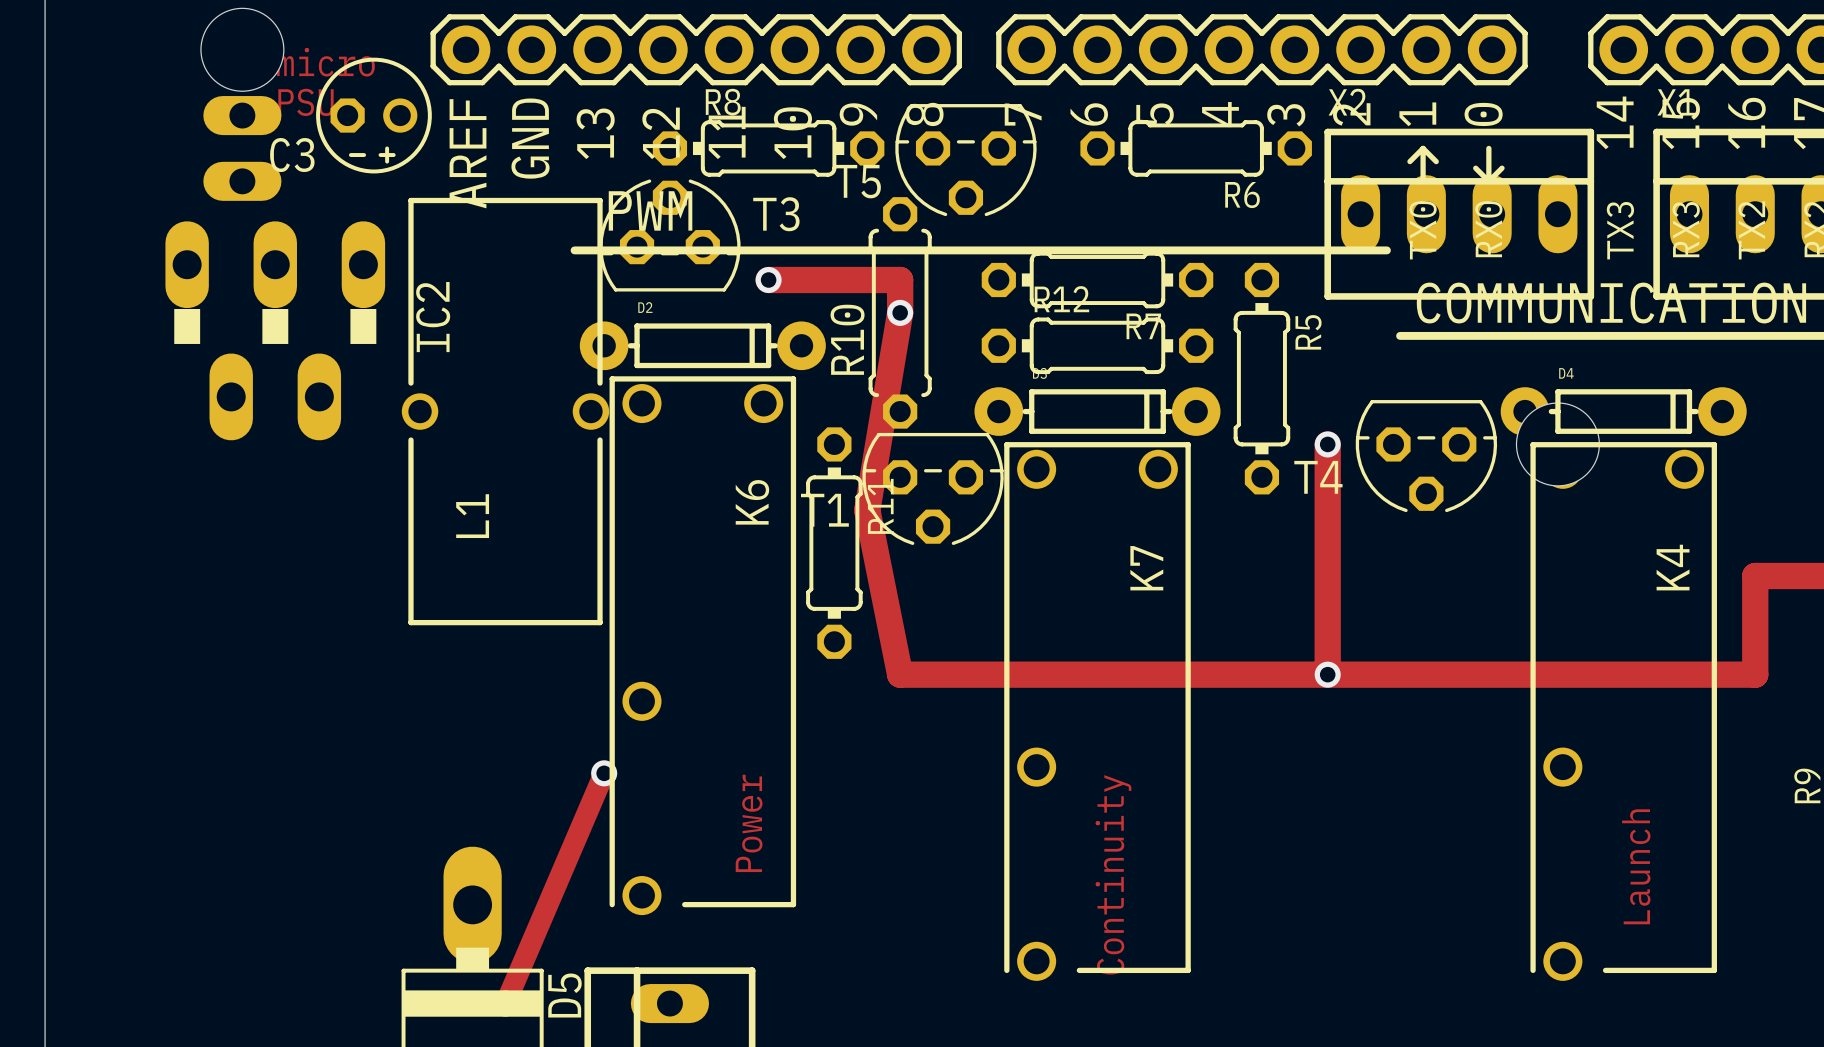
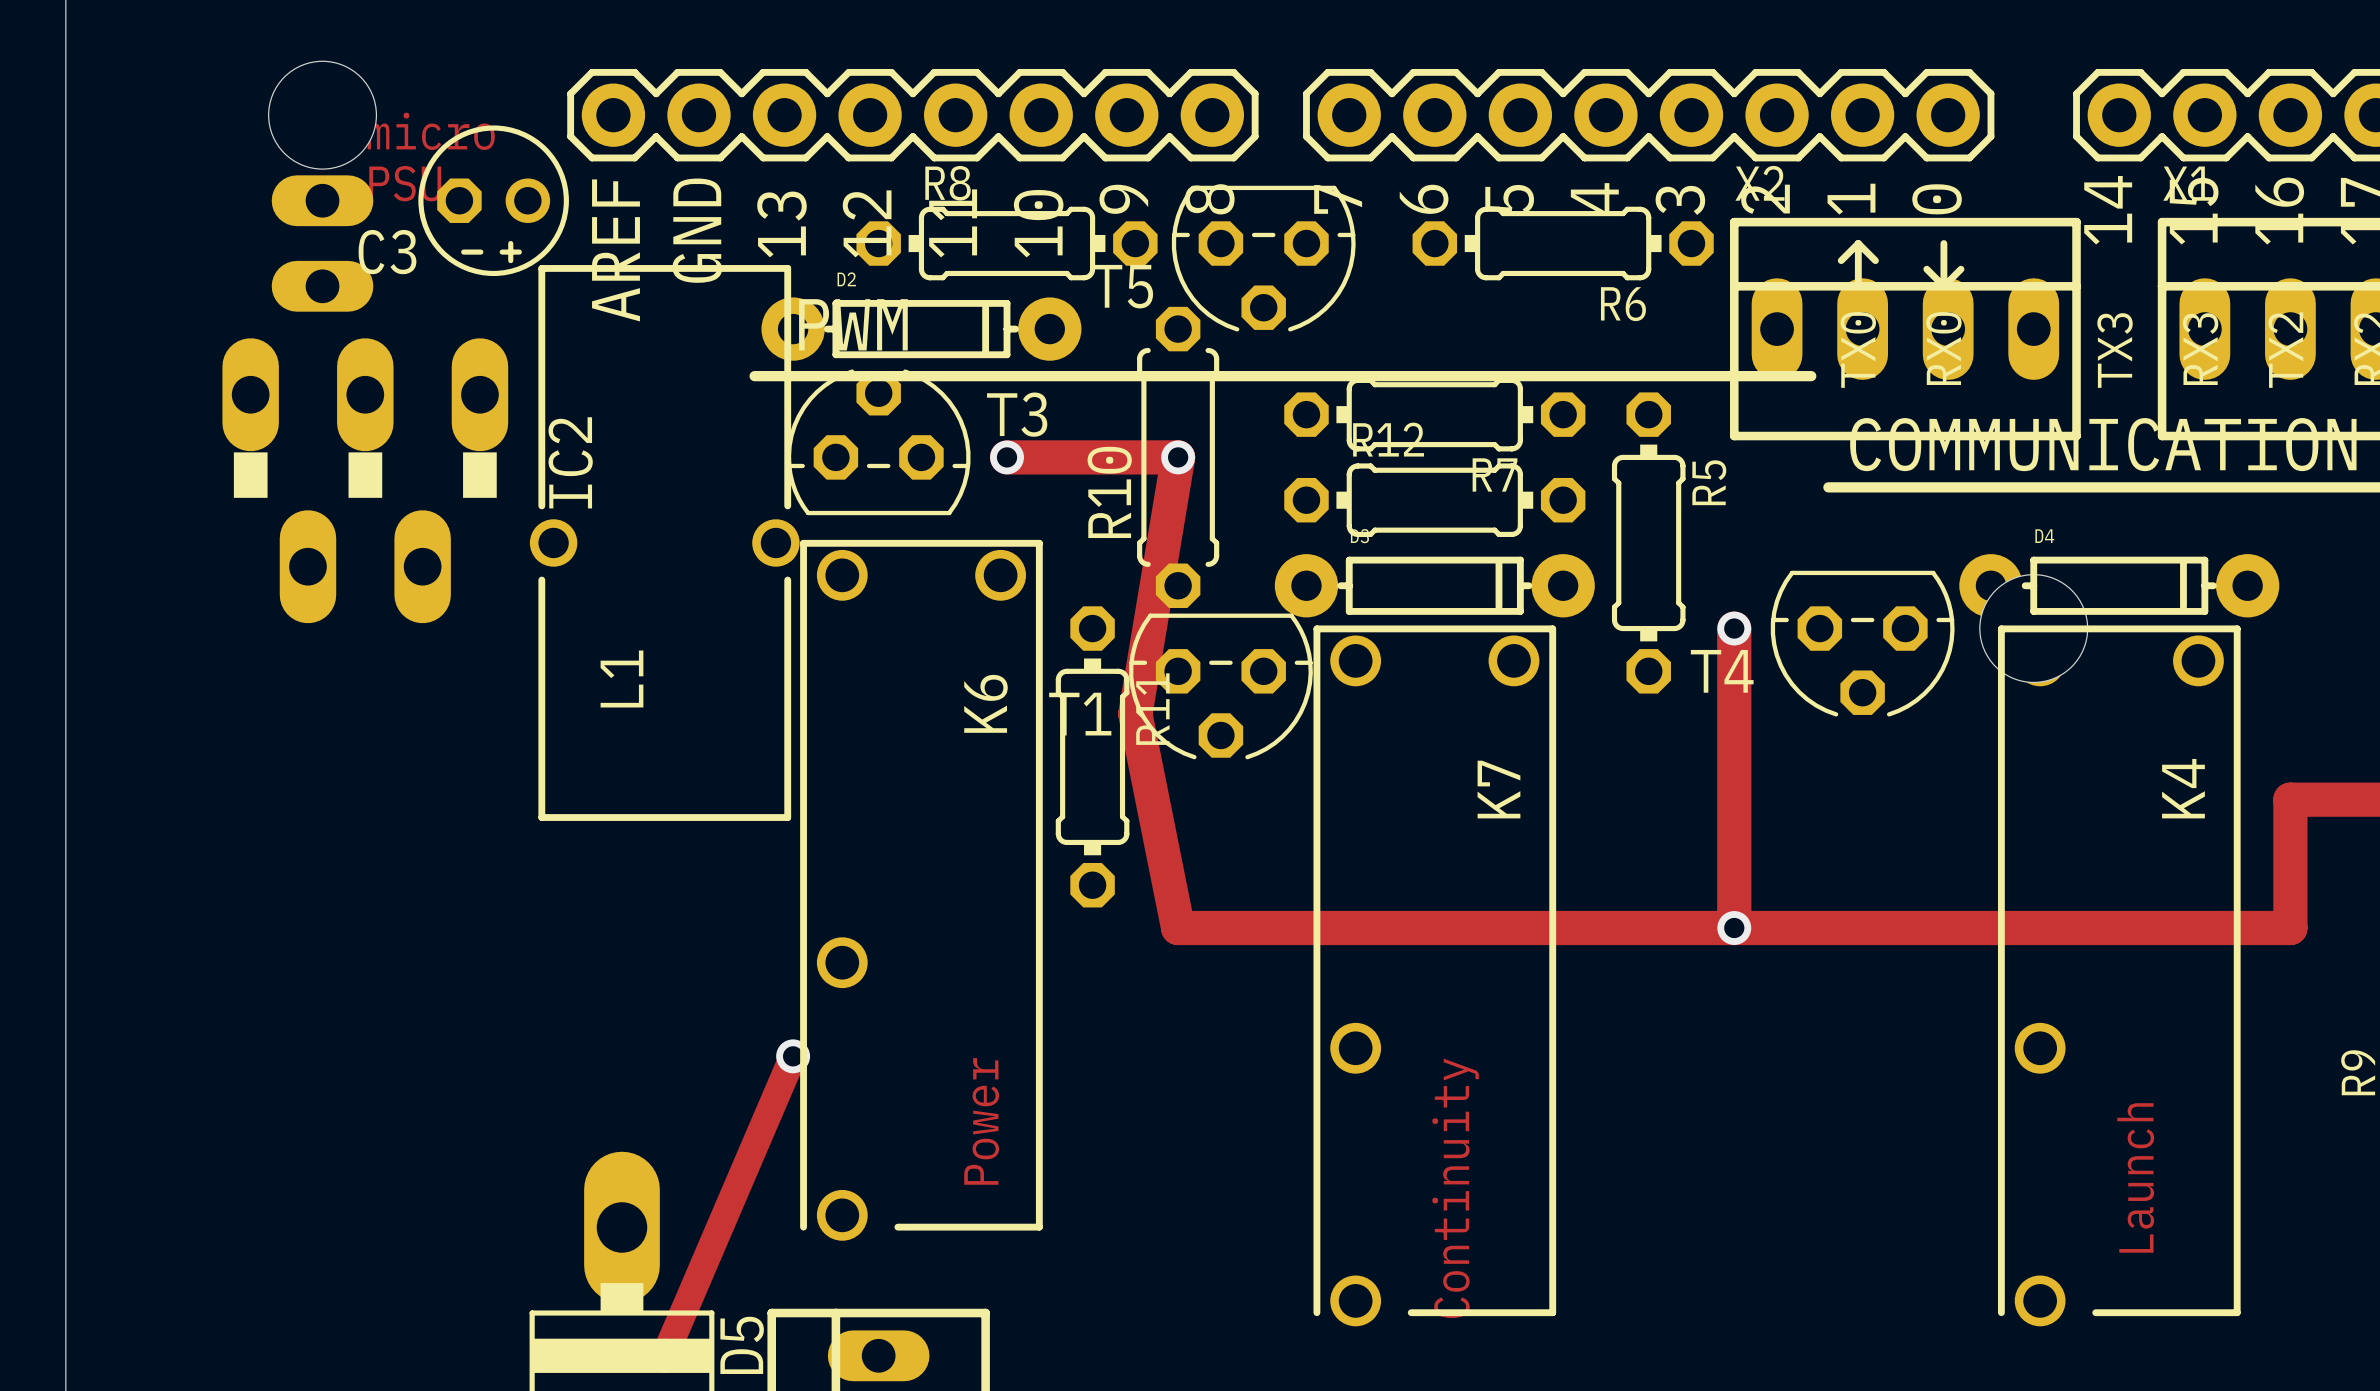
T3 position: (669, 235) -> (878, 442)
track: (768, 280) (900, 280) (900, 312) -> (1007, 457) (1178, 457)
via position: (768, 280) -> (1007, 457)
D2 position: (702, 345) -> (921, 329)
L1 position: (505, 411) -> (664, 542)

